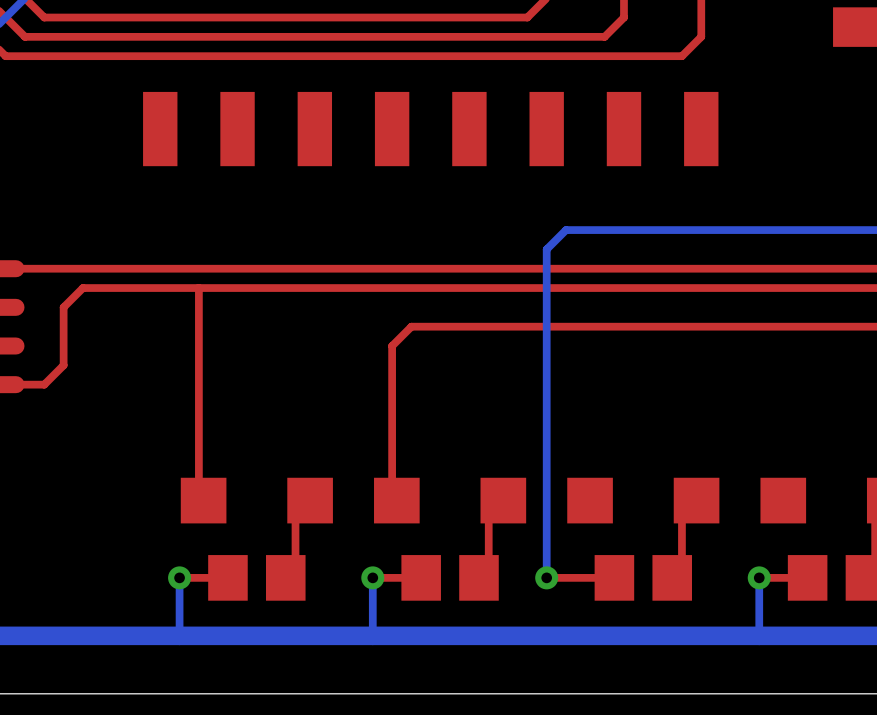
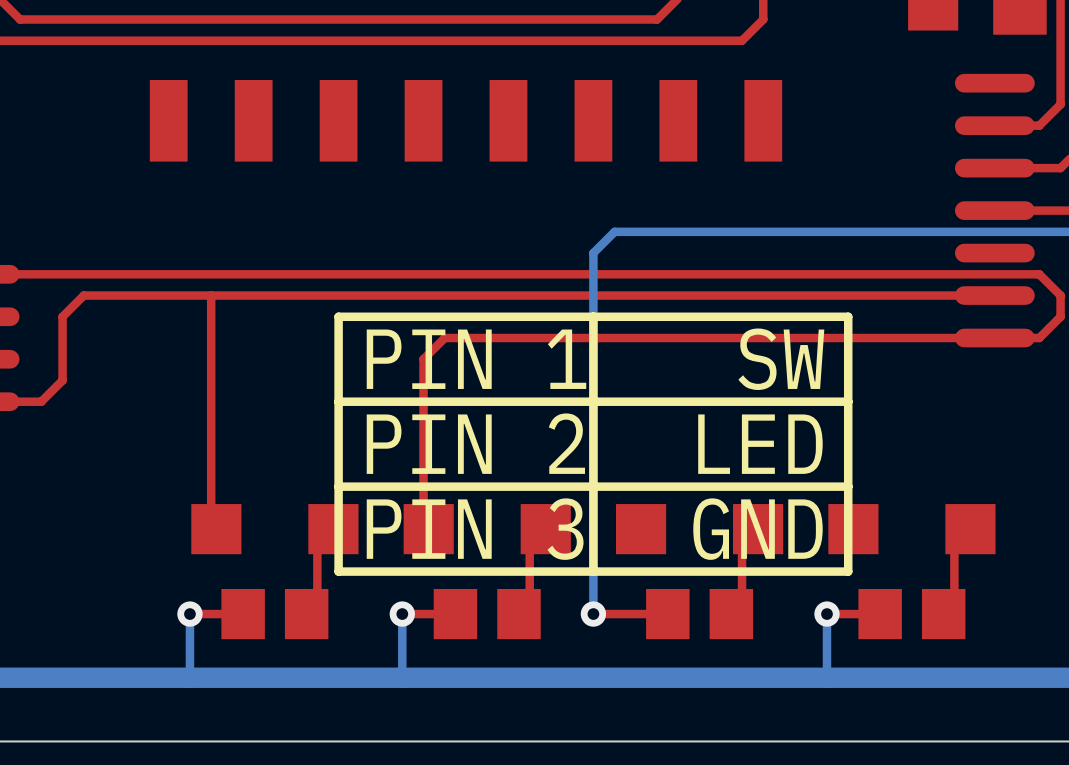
line: none -> (593, 316) (593, 571)
line: none -> (848, 316) (338, 316) (338, 571) (848, 571) (848, 316)
text: none -> PIN 1 (476, 359)
text: none -> SW (781, 359)
line: none -> (848, 401) (338, 401)
text: none -> PIN 2 (475, 443)
text: none -> LED (760, 444)
line: none -> (848, 486) (338, 486)
text: none -> PIN 3 (475, 529)
text: none -> GND (757, 529)

